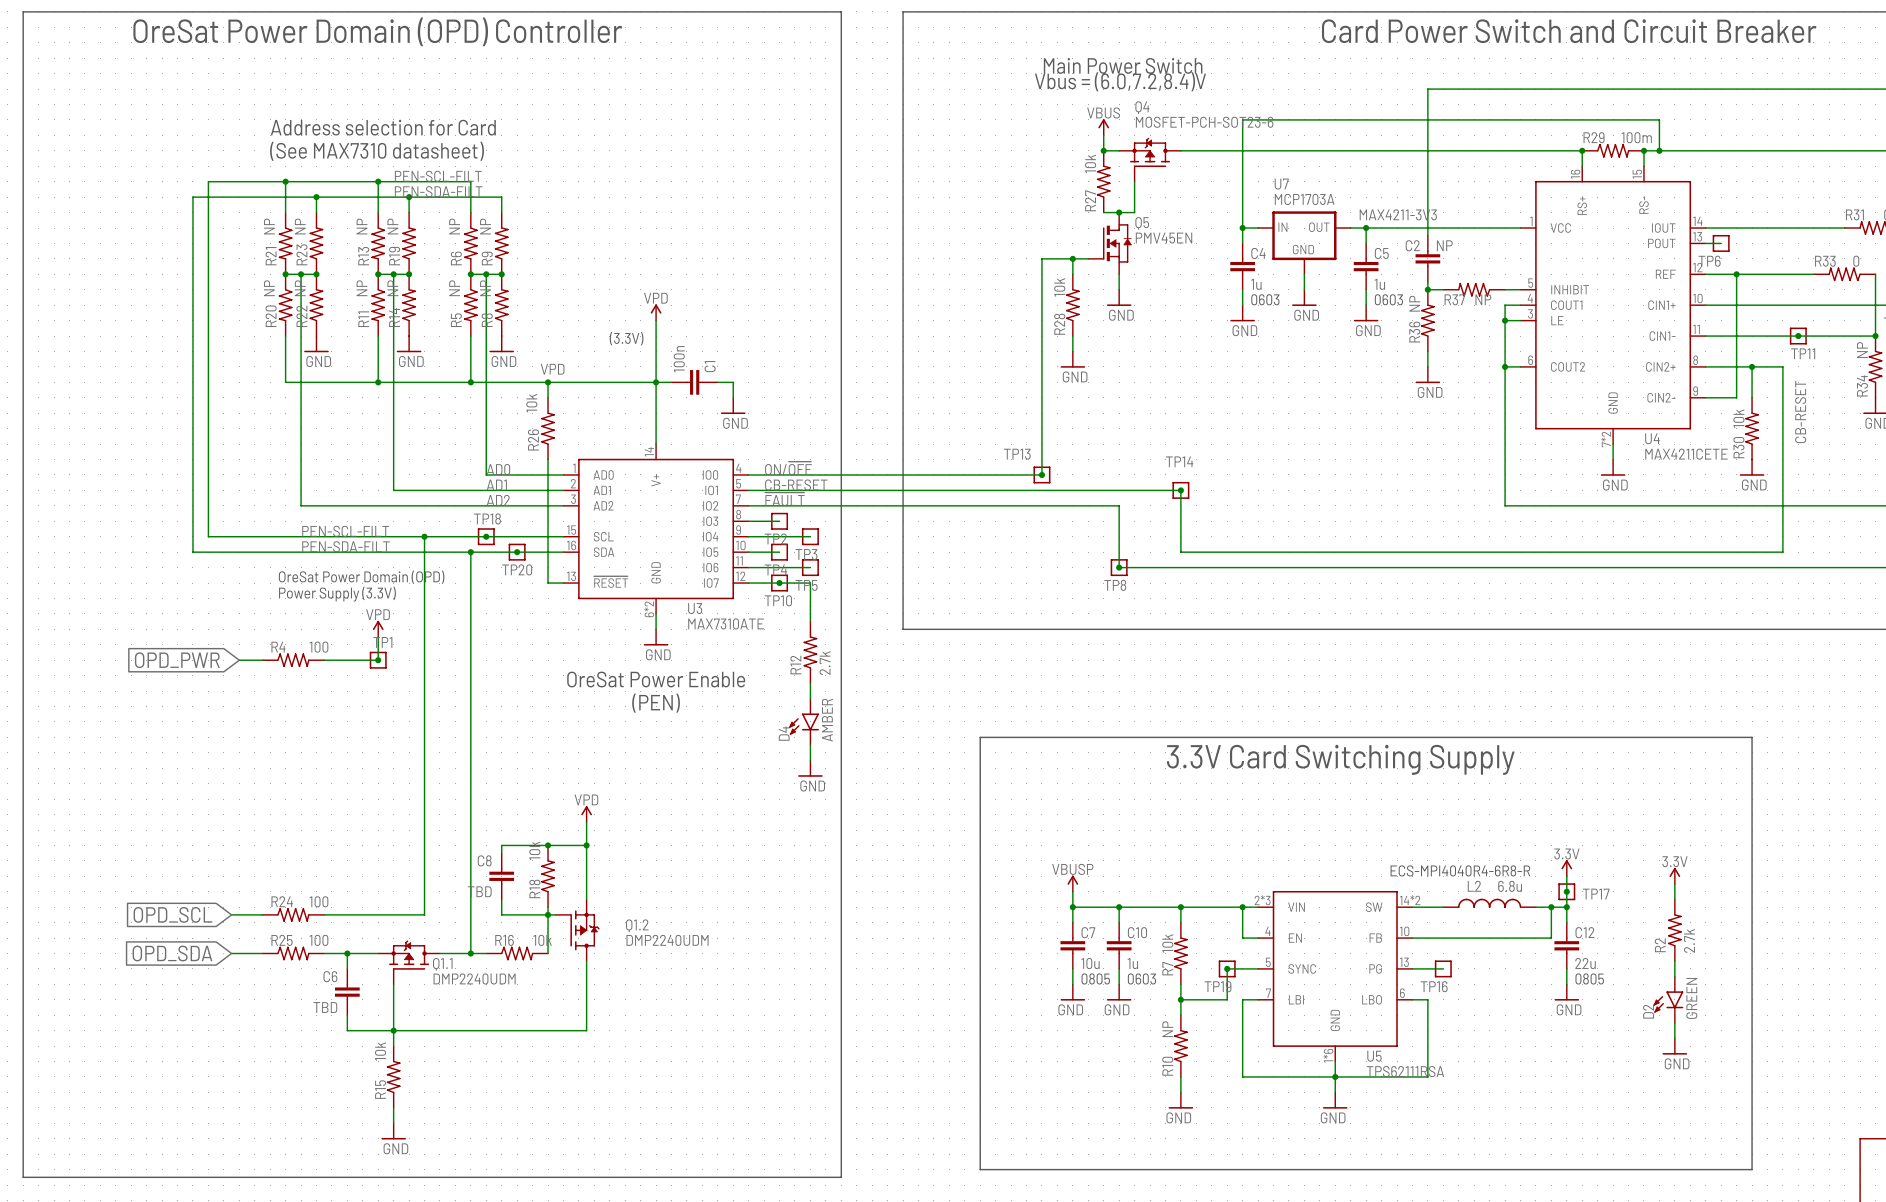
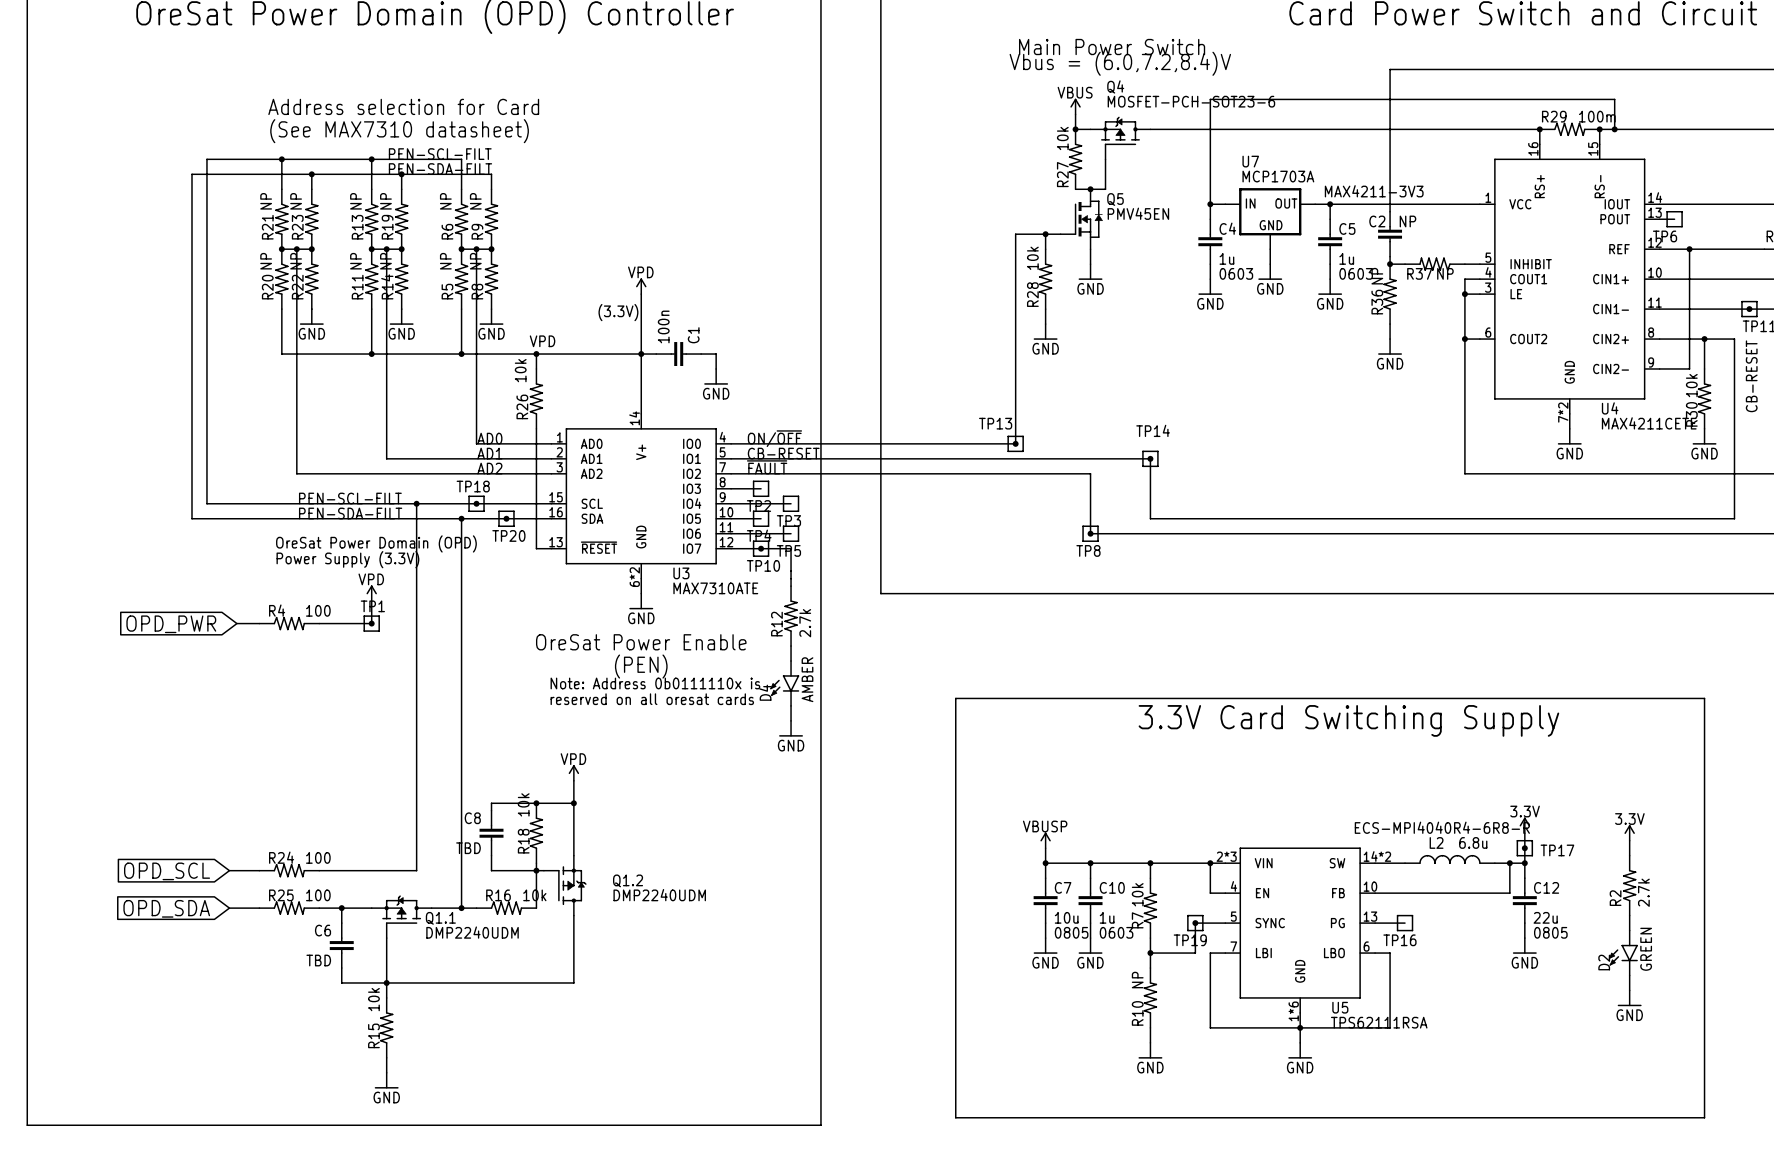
text: none -> Note: Address 0b0111110x is (655, 683)
text: none -> reserved on all oresat cards (652, 699)

